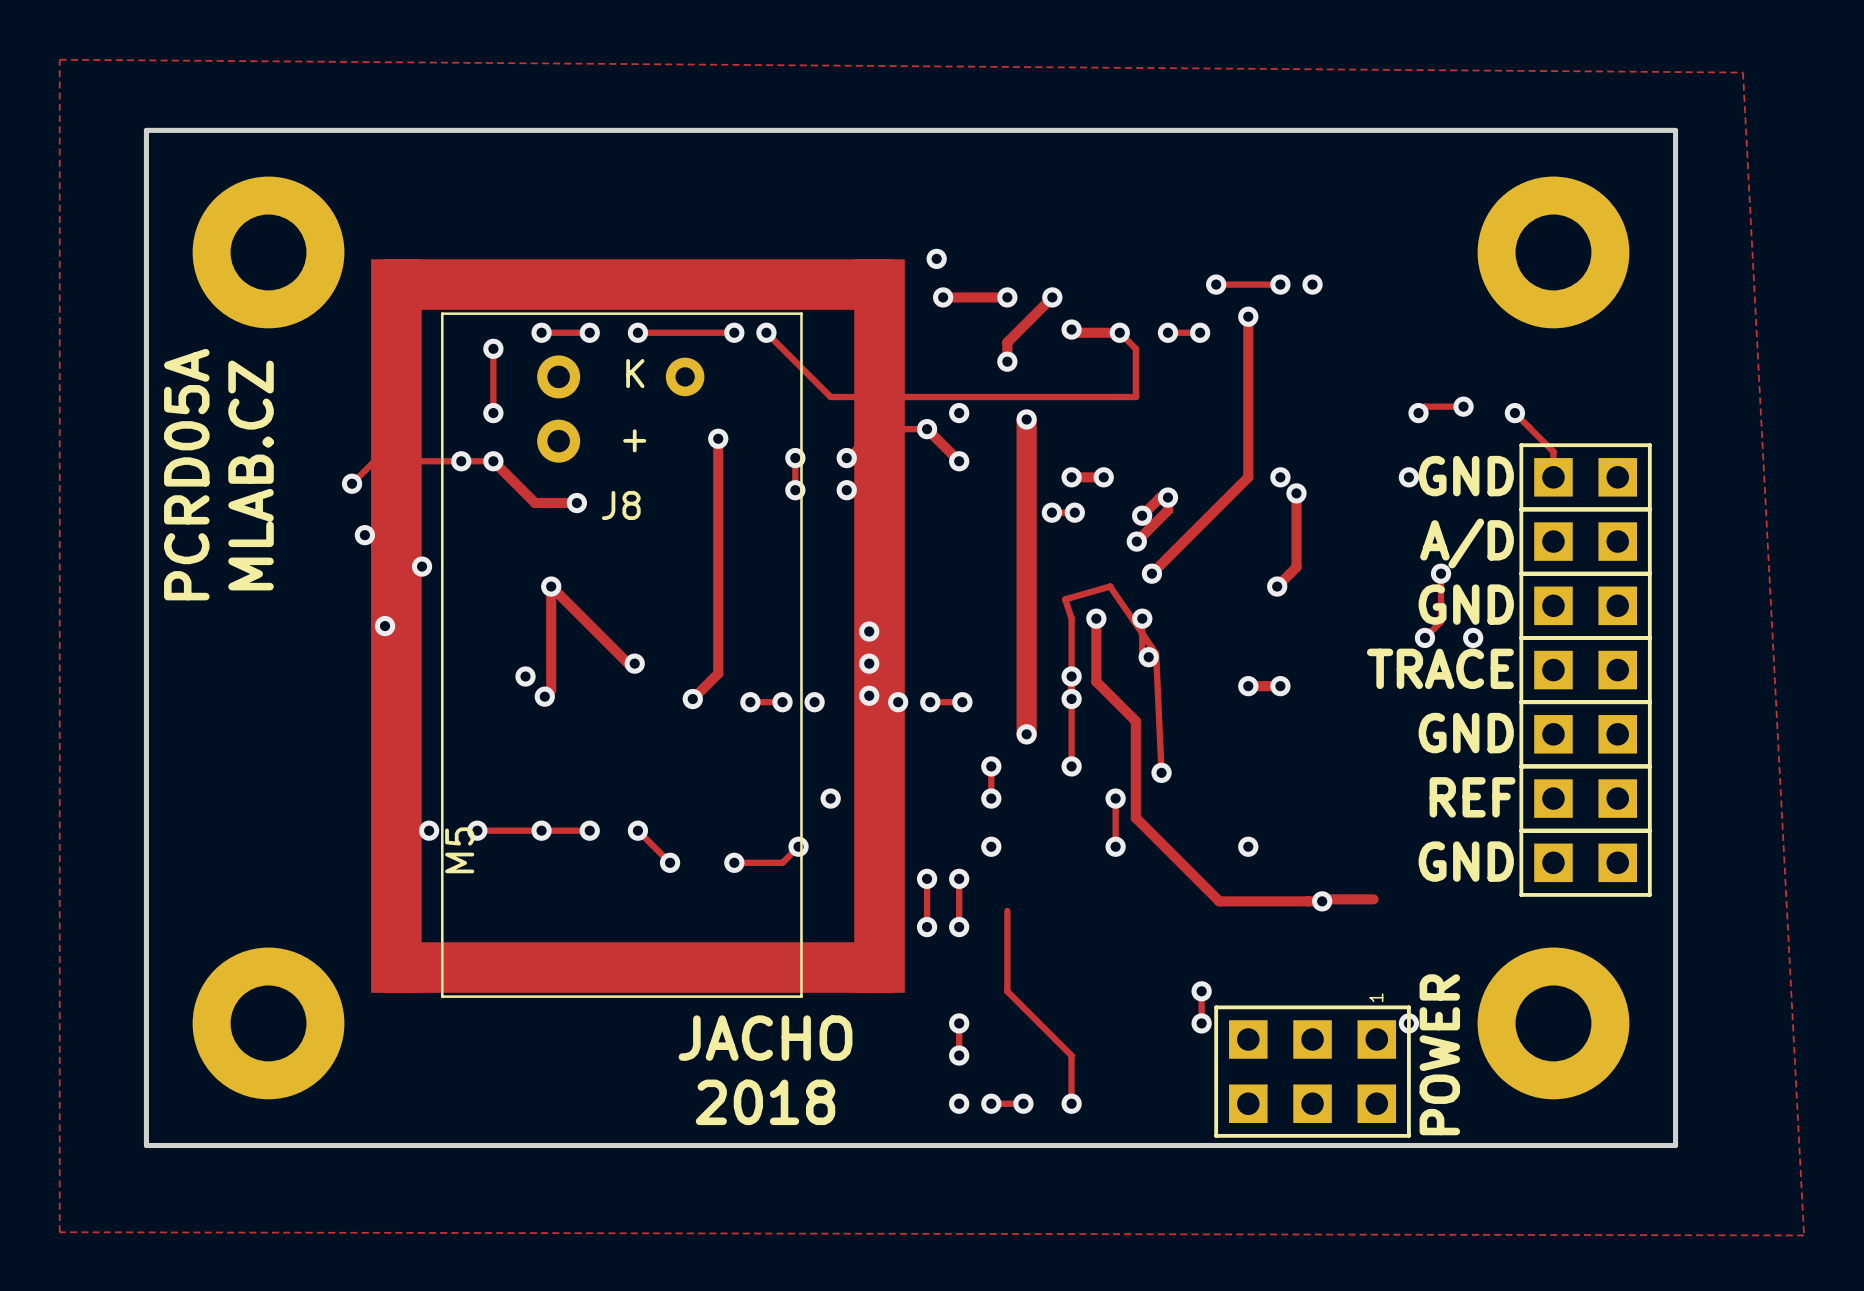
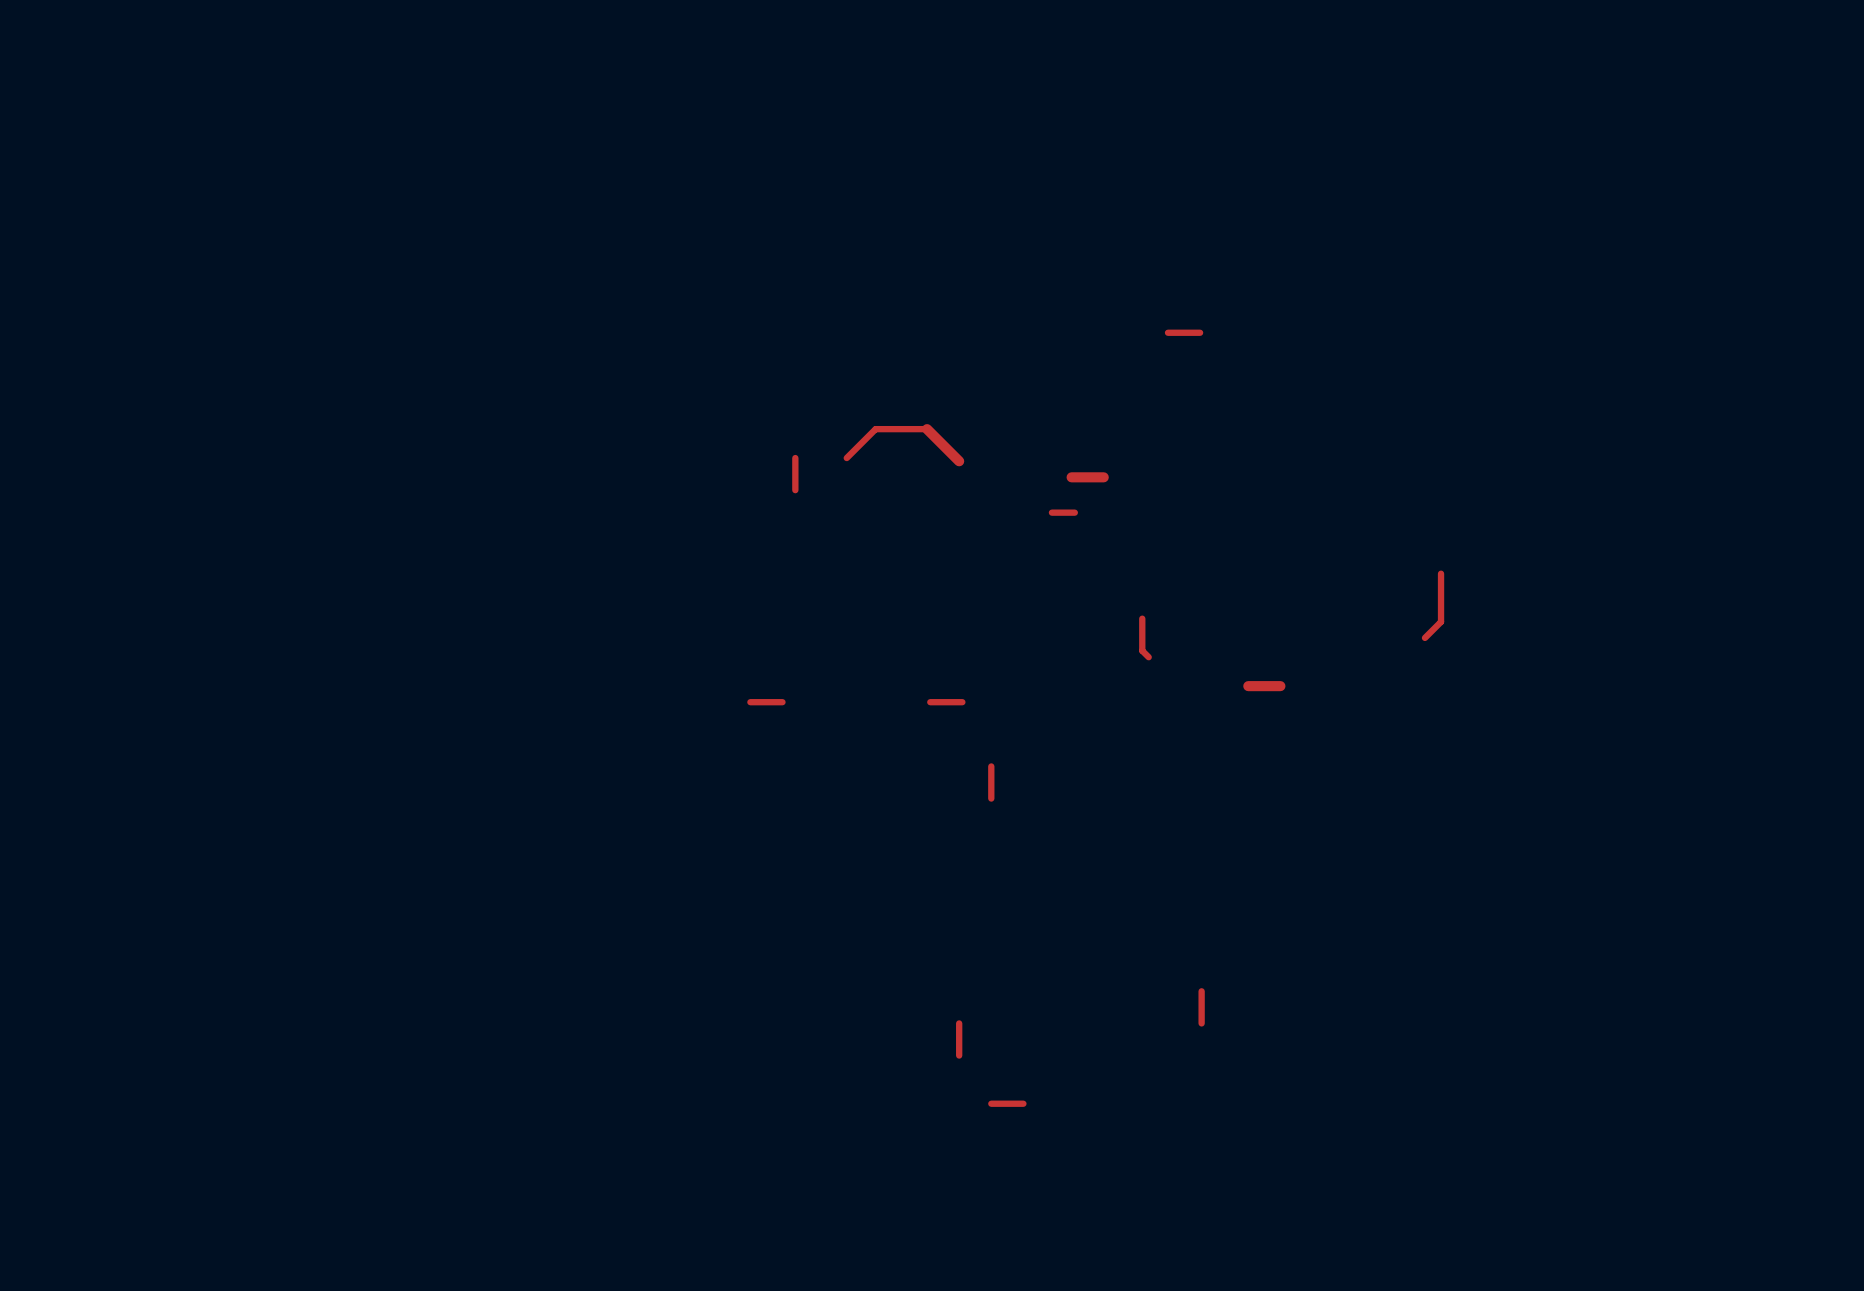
zone outline: (59, 59) (1743, 72) (1804, 1235) (59, 1232) (59, 59) -> none
board edge: (146, 130) (146, 1145) (1675, 1145) (1675, 130) (146, 130) -> none
part: (268, 252) -> none
part: (1553, 252) -> none
via: (936, 258) -> none
track: (1216, 284) (1280, 284) -> none
via: (1216, 284) -> none
via: (1280, 284) -> none
via: (1312, 284) -> none
track: (943, 297) (1007, 297) -> none
via: (943, 297) -> none
via: (1007, 297) -> none
track: (1052, 297) (1007, 342) (1007, 361) -> none
via: (1052, 297) -> none
track: (1248, 316) (1248, 477) (1151, 573) -> none
via: (1248, 316) -> none
track: (1071, 329) (1074, 332) (1119, 332) (1135, 348) (1135, 397) (830, 397) (766, 332) -> none
via: (1071, 329) -> none
track: (541, 332) (589, 332) -> none
via: (541, 332) -> none
via: (589, 332) -> none
track: (637, 332) (734, 332) -> none
via: (637, 332) -> none
via: (734, 332) -> none
via: (766, 332) -> none
via: (1119, 332) -> none
via: (1167, 332) -> none
via: (1200, 332) -> none
track: (493, 348) (493, 413) -> none
via: (493, 348) -> none
via: (1007, 361) -> none
text: K (635, 373) -> none
track: (1463, 406) (1424, 406) (1418, 413) -> none
via: (1463, 406) -> none
via: (493, 413) -> none
via: (959, 413) -> none
via: (1418, 413) -> none
track: (1514, 413) (1553, 451) (1553, 477) -> none
via: (1514, 413) -> none
track: (1026, 419) (1026, 734) -> none
via: (1026, 419) -> none
via: (927, 429) -> none
track: (718, 438) (718, 673) (692, 699) -> none
via: (718, 438) -> none
text: + (634, 440) -> none
via: (795, 458) -> none
via: (846, 458) -> none
via: (461, 461) -> none
via: (493, 461) -> none
via: (959, 461) -> none
text: PCRD05A (186, 474) -> none
text: MLAB.CZ (251, 475) -> none
text: GND (1466, 476) -> none
via: (1071, 477) -> none
via: (1103, 477) -> none
via: (1280, 477) -> none
via: (1408, 477) -> none
part: (1585, 477) -> none
track: (352, 483) (374, 461) (493, 461) (535, 503) (576, 503) -> none
via: (352, 483) -> none
via: (795, 490) -> none
via: (846, 490) -> none
track: (1296, 493) (1296, 567) (1277, 586) -> none
via: (1296, 493) -> none
via: (1167, 497) -> none
via: (576, 503) -> none
via: (1051, 512) -> none
via: (1074, 512) -> none
track: (1142, 515) (1160, 497) (1167, 497) (1167, 510) (1136, 541) -> none
via: (1142, 515) -> none
via: (364, 535) -> none
via: (1136, 541) -> none
part: (1585, 541) -> none
text: A/D (1467, 543) -> none
via: (422, 566) -> none
via: (1151, 573) -> none
via: (1441, 573) -> none
via: (551, 586) -> none
via: (1277, 586) -> none
text: GND (1466, 604) -> none
part: (1585, 605) -> none
track: (1096, 618) (1096, 681) (1135, 721) (1135, 817) (1219, 901) (1373, 899) -> none
via: (1096, 618) -> none
via: (1142, 618) -> none
via: (385, 626) -> none
M5: (637, 626) -> none
via: (869, 631) -> none
via: (1424, 637) -> none
via: (1473, 637) -> none
J8: (621, 655) -> none
via: (1148, 657) -> none
track: (634, 663) (628, 663) (551, 586) (551, 690) (544, 696) -> none
via: (634, 663) -> none
via: (869, 663) -> none
text: TRACE (1440, 668) -> none
part: (1585, 670) -> none
via: (525, 676) -> none
via: (1071, 676) -> none
via: (1248, 686) -> none
via: (1280, 686) -> none
via: (869, 695) -> none
via: (544, 696) -> none
via: (1071, 698) -> none
via: (692, 699) -> none
via: (750, 702) -> none
via: (782, 702) -> none
via: (814, 702) -> none
via: (898, 702) -> none
via: (930, 702) -> none
via: (962, 702) -> none
text: GND (1466, 733) -> none
via: (1026, 734) -> none
part: (1585, 734) -> none
via: (991, 766) -> none
track: (1071, 766) (1071, 618) (1065, 599) (1110, 586) (1156, 653) (1161, 772) -> none
via: (1071, 766) -> none
via: (1161, 772) -> none
text: REF (1472, 797) -> none
via: (830, 798) -> none
via: (991, 798) -> none
track: (1115, 798) (1115, 846) -> none
via: (1115, 798) -> none
part: (1585, 798) -> none
via: (429, 830) -> none
track: (477, 830) (589, 830) -> none
via: (477, 830) -> none
via: (541, 830) -> none
via: (589, 830) -> none
track: (637, 830) (670, 862) -> none
via: (637, 830) -> none
track: (798, 846) (782, 862) (734, 862) -> none
via: (798, 846) -> none
via: (991, 846) -> none
via: (1115, 846) -> none
via: (1248, 846) -> none
text: GND (1466, 861) -> none
via: (670, 862) -> none
via: (734, 862) -> none
part: (1585, 862) -> none
track: (927, 878) (927, 927) -> none
via: (927, 878) -> none
track: (959, 878) (959, 927) -> none
via: (959, 878) -> none
via: (1322, 901) -> none
track: (1007, 910) (1007, 991) (1071, 1055) (1071, 1103) -> none
via: (927, 927) -> none
via: (959, 927) -> none
via: (1201, 991) -> none
part: (268, 1023) -> none
via: (959, 1023) -> none
via: (1201, 1023) -> none
via: (1408, 1023) -> none
part: (1553, 1023) -> none
text: JACHO (765, 1038) -> none
text: POWER (1439, 1054) -> none
via: (959, 1055) -> none
part: (1312, 1071) -> none
text: 2018 (765, 1102) -> none
via: (959, 1103) -> none
via: (991, 1103) -> none
via: (1023, 1103) -> none
via: (1071, 1103) -> none

